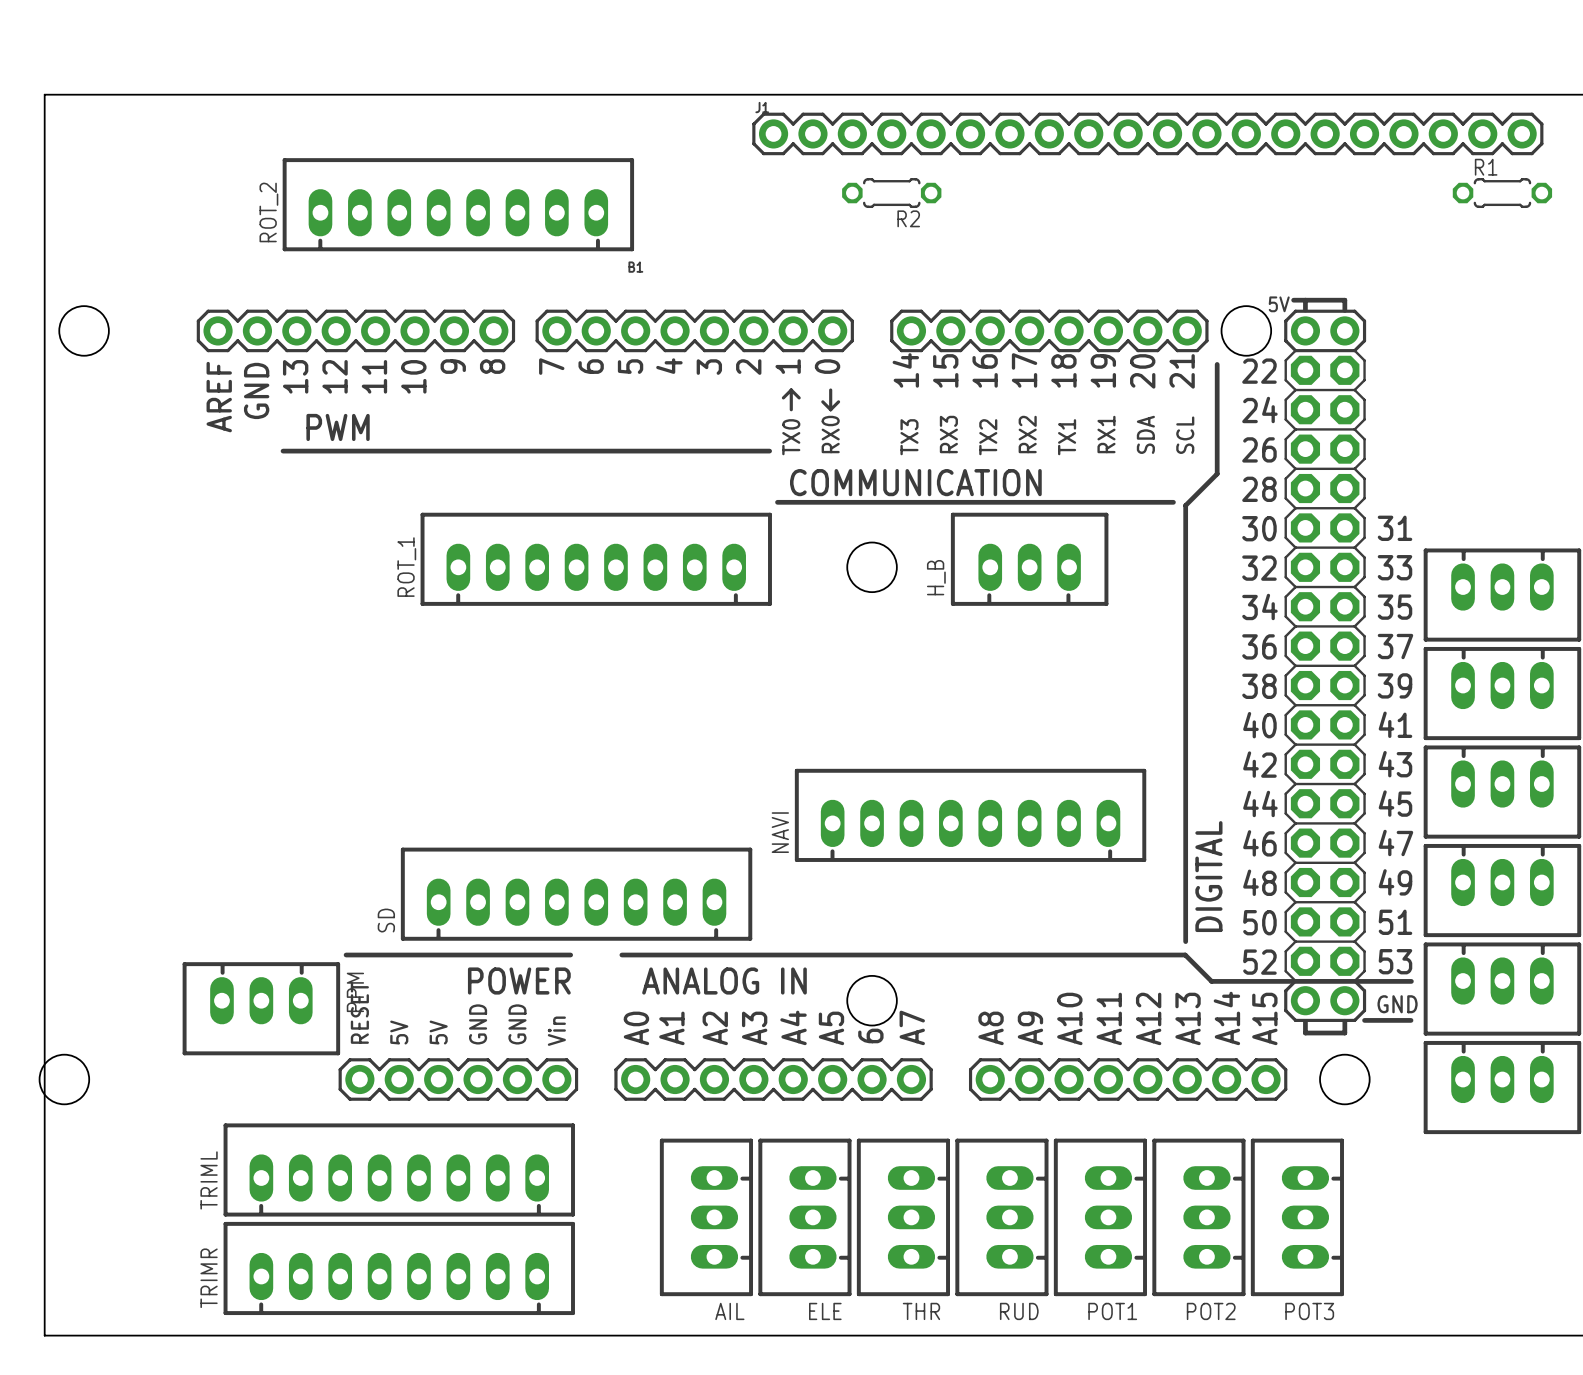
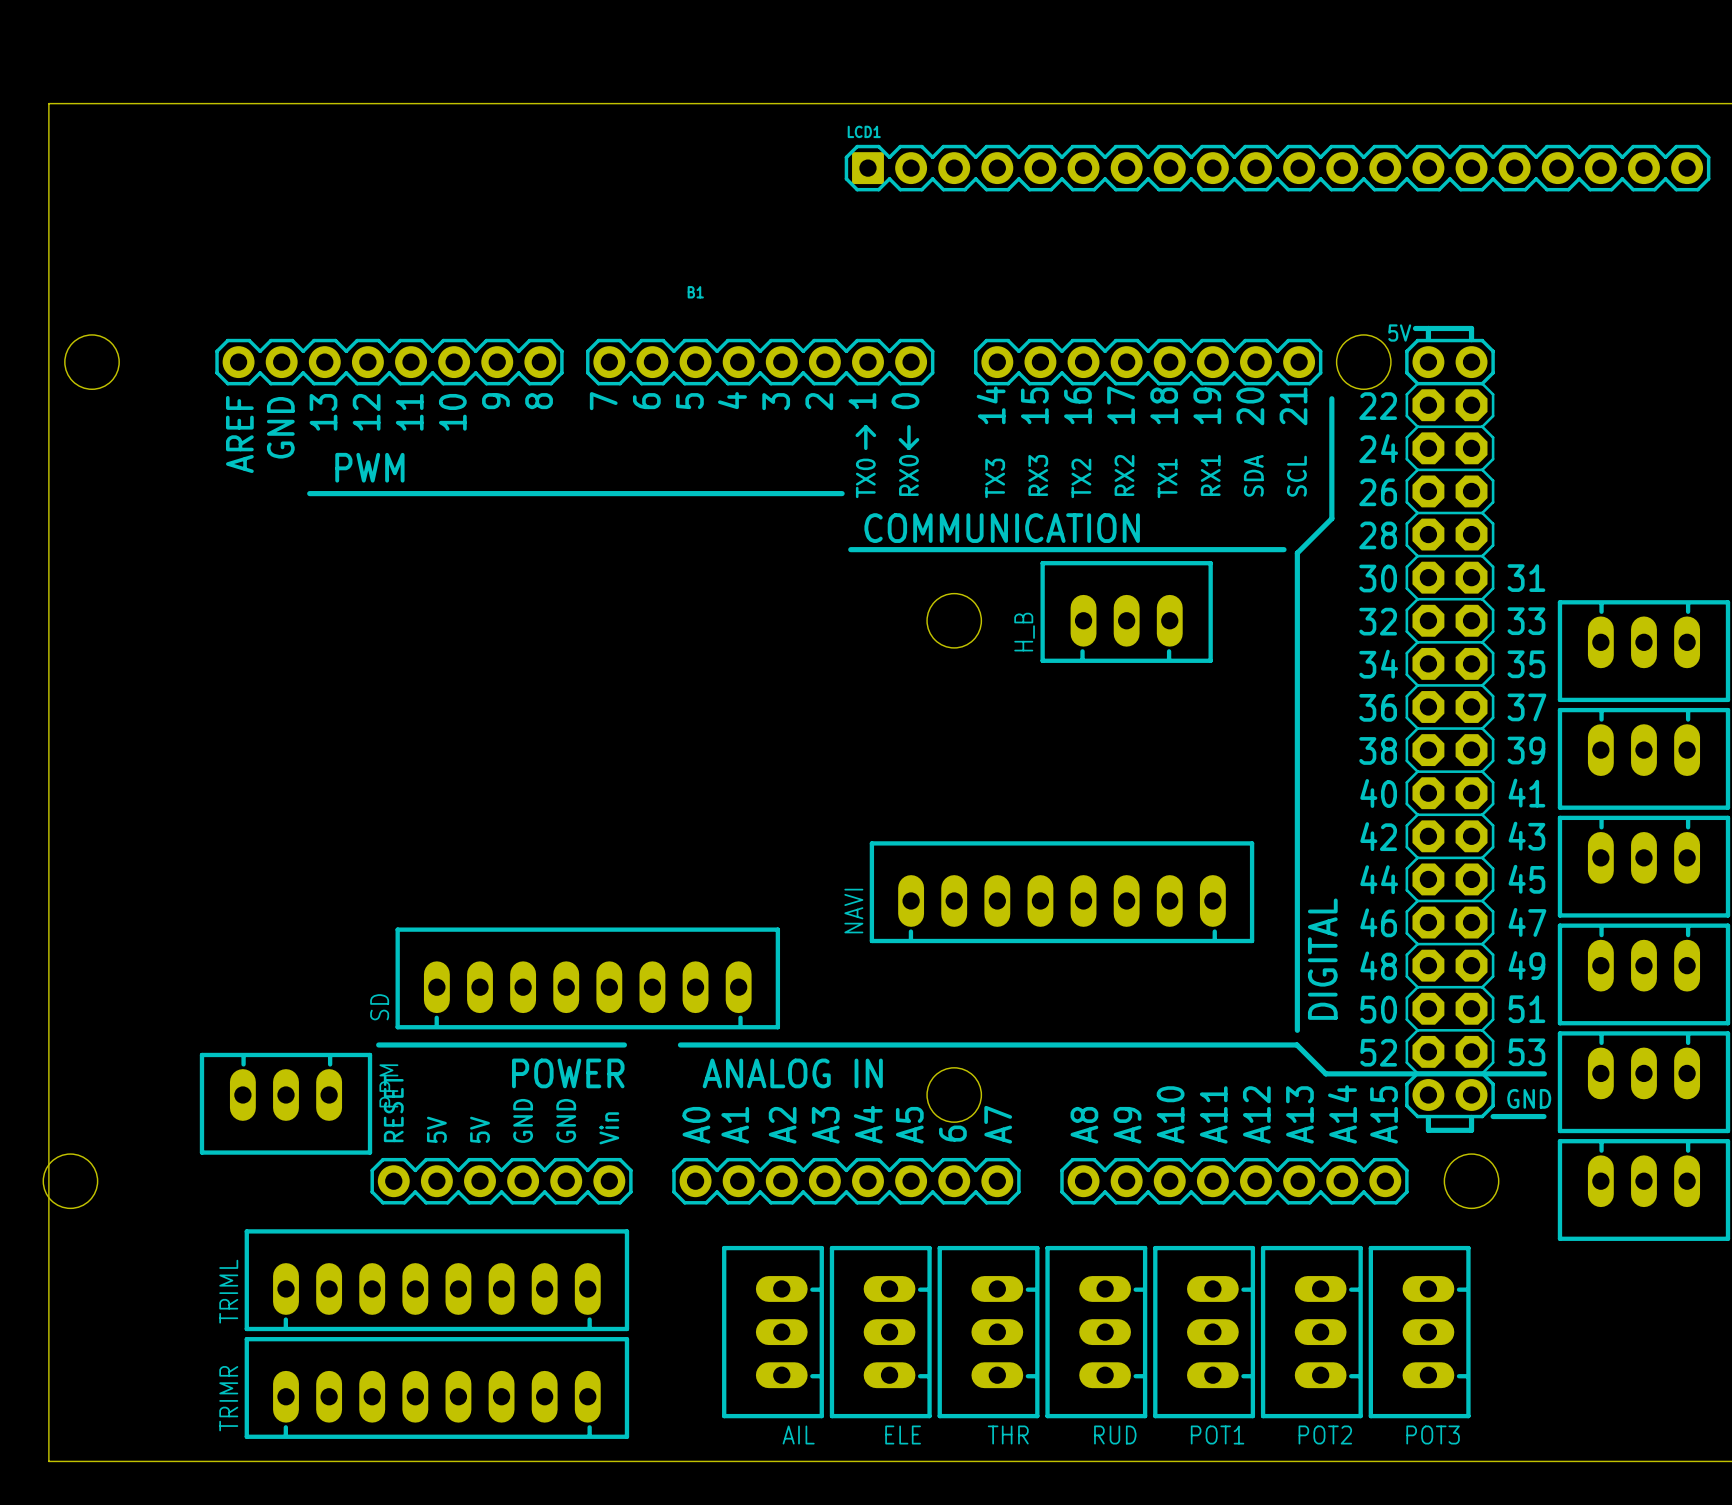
J1: (1147, 133) -> none
LCD1: none -> (1277, 168)
R2: (891, 193) -> none
R1: (1502, 193) -> none
ROT_2: (458, 204) -> none
ROT_1: (596, 559) -> none
SD position: (576, 894) -> (587, 978)

